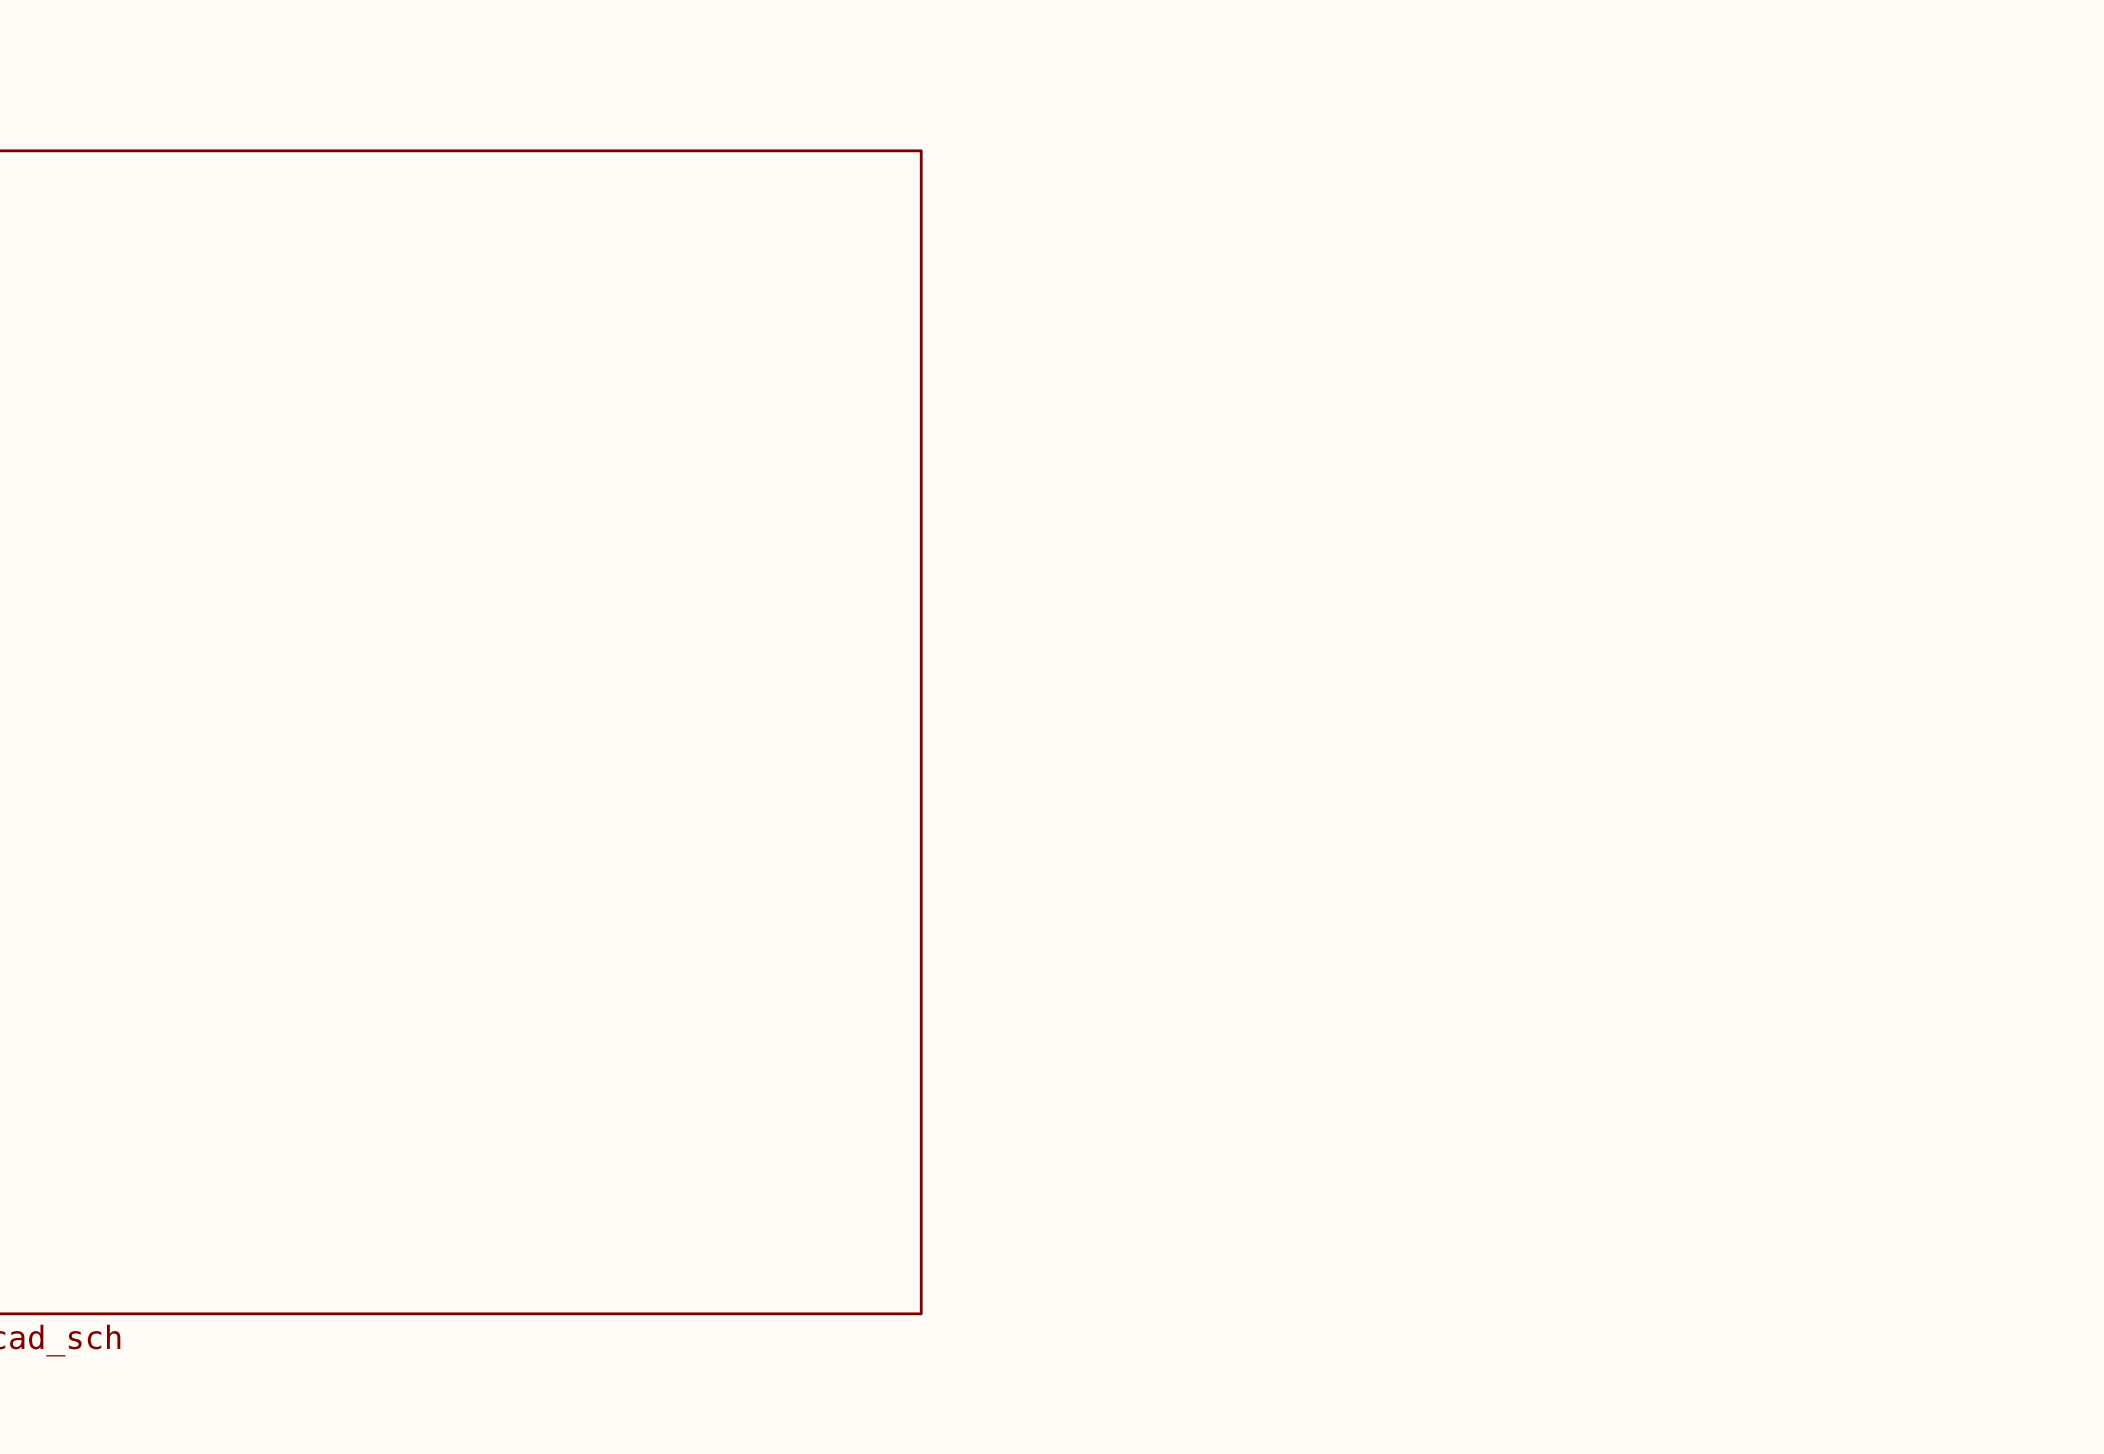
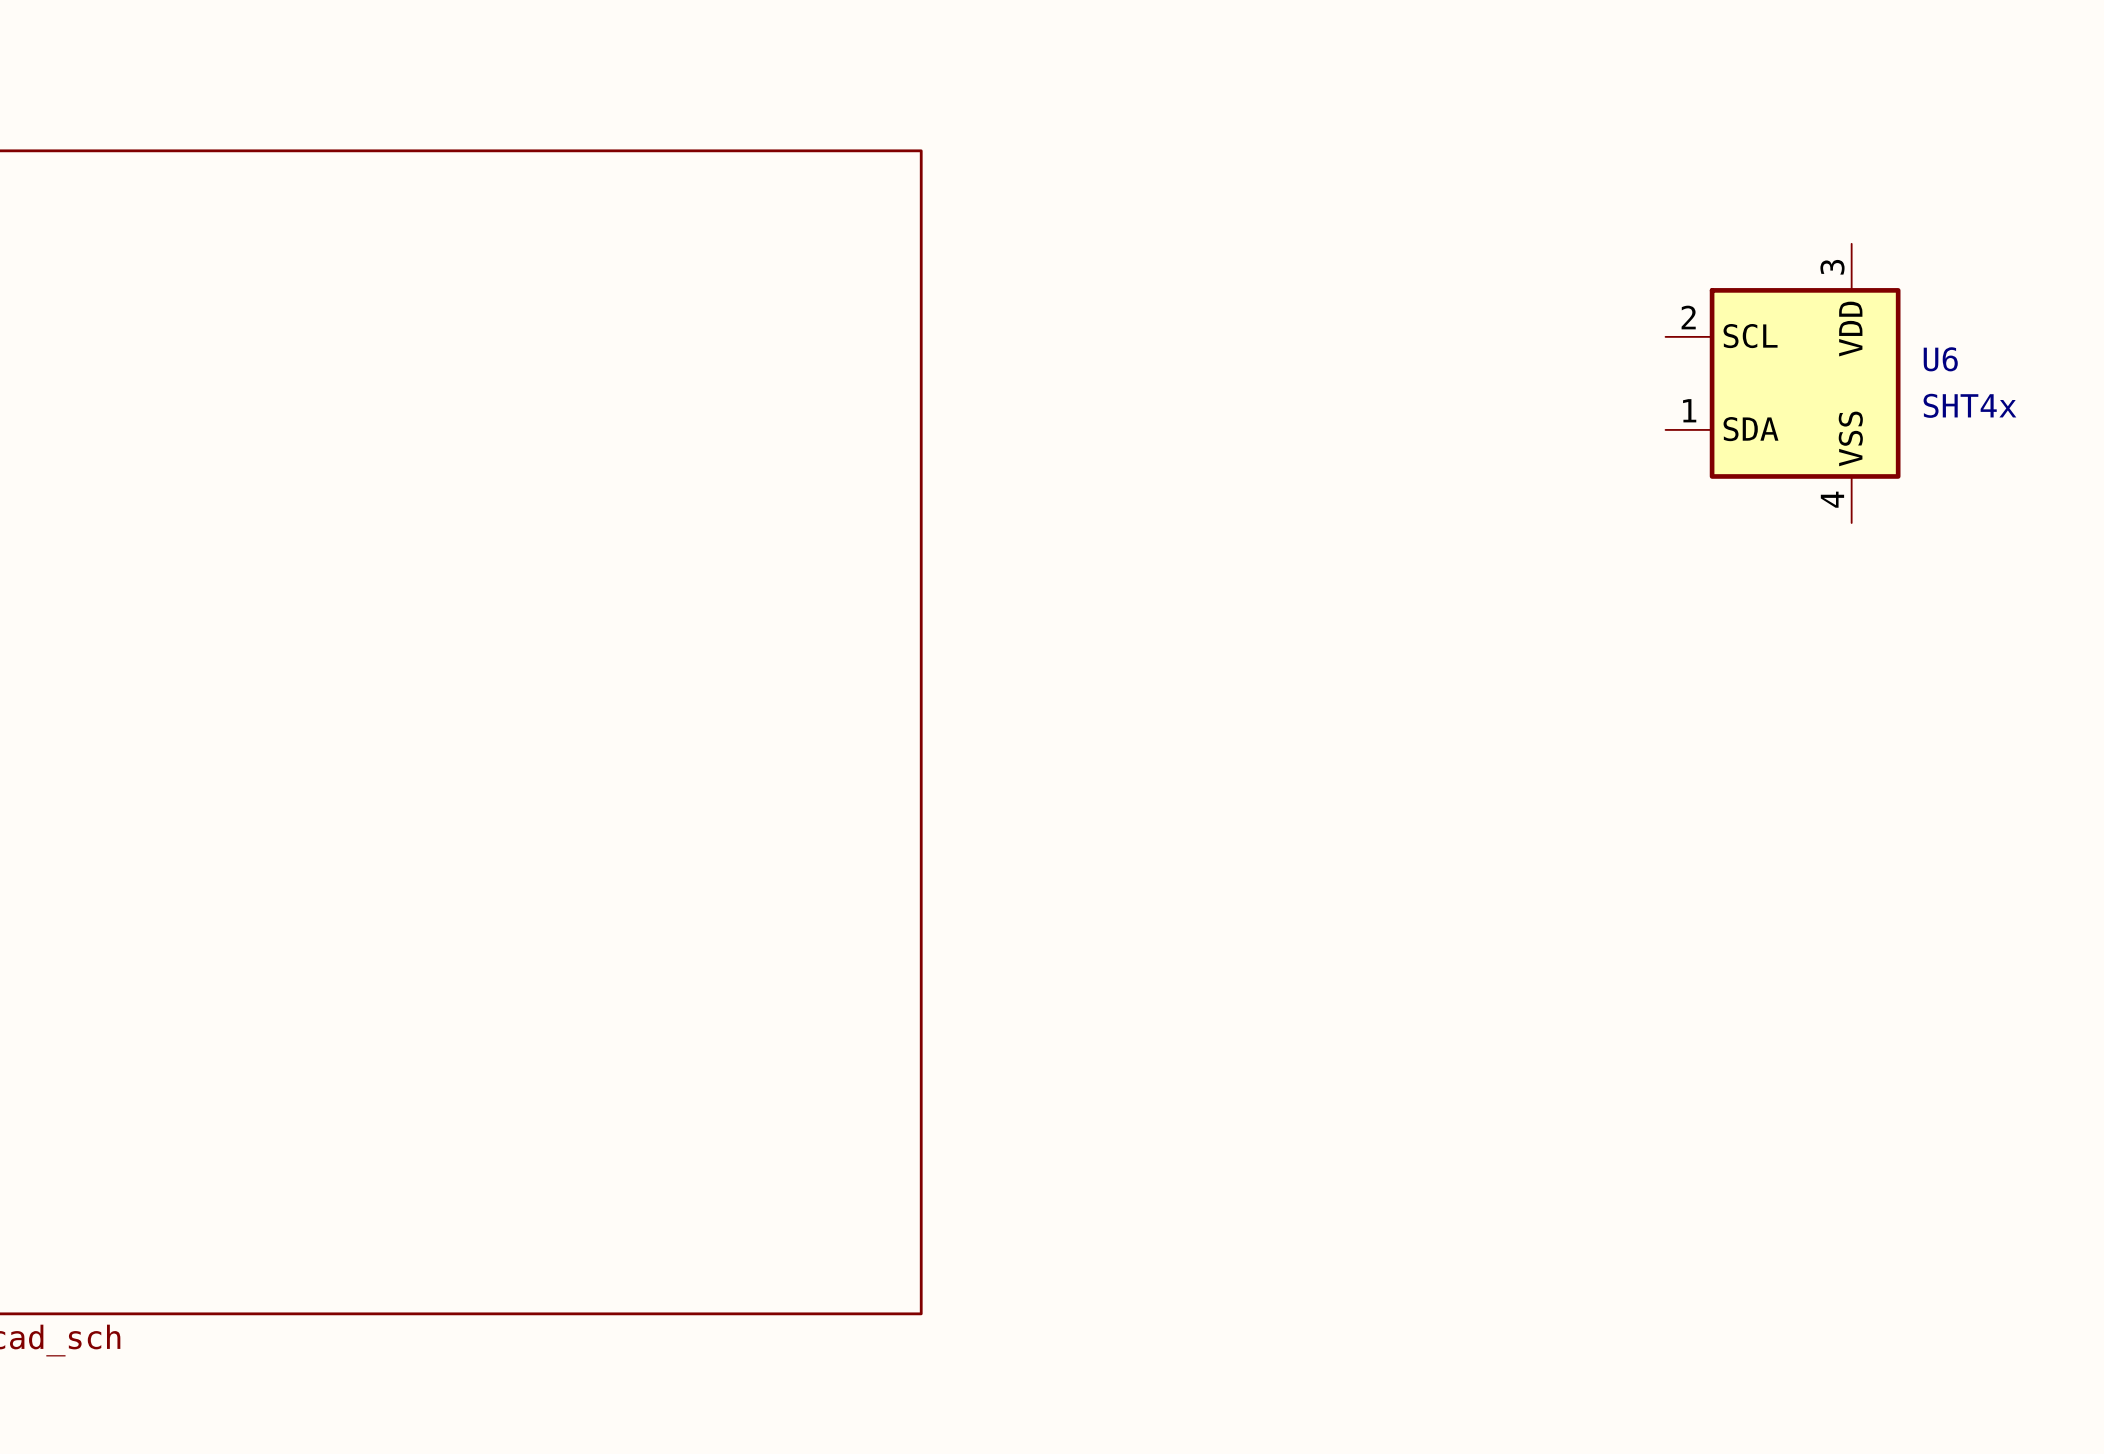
U6: none -> SHT4x (1783, 383)

